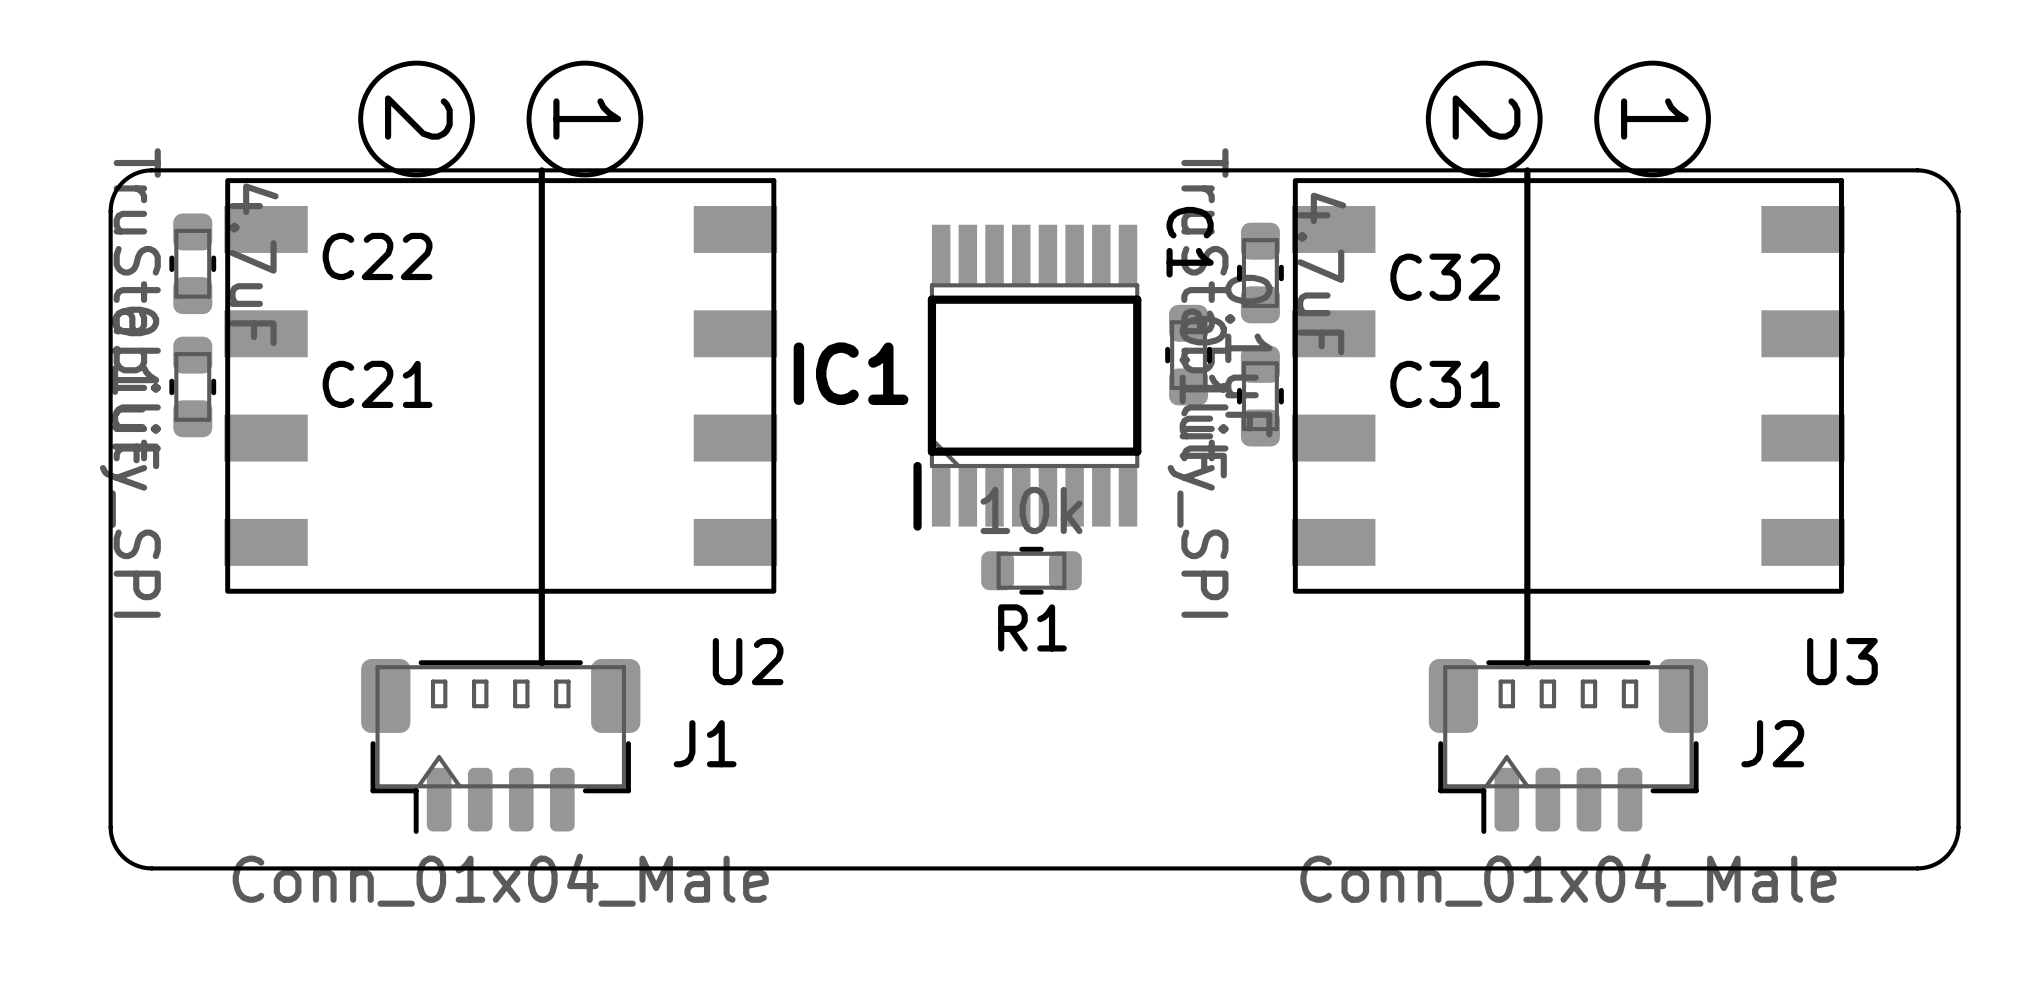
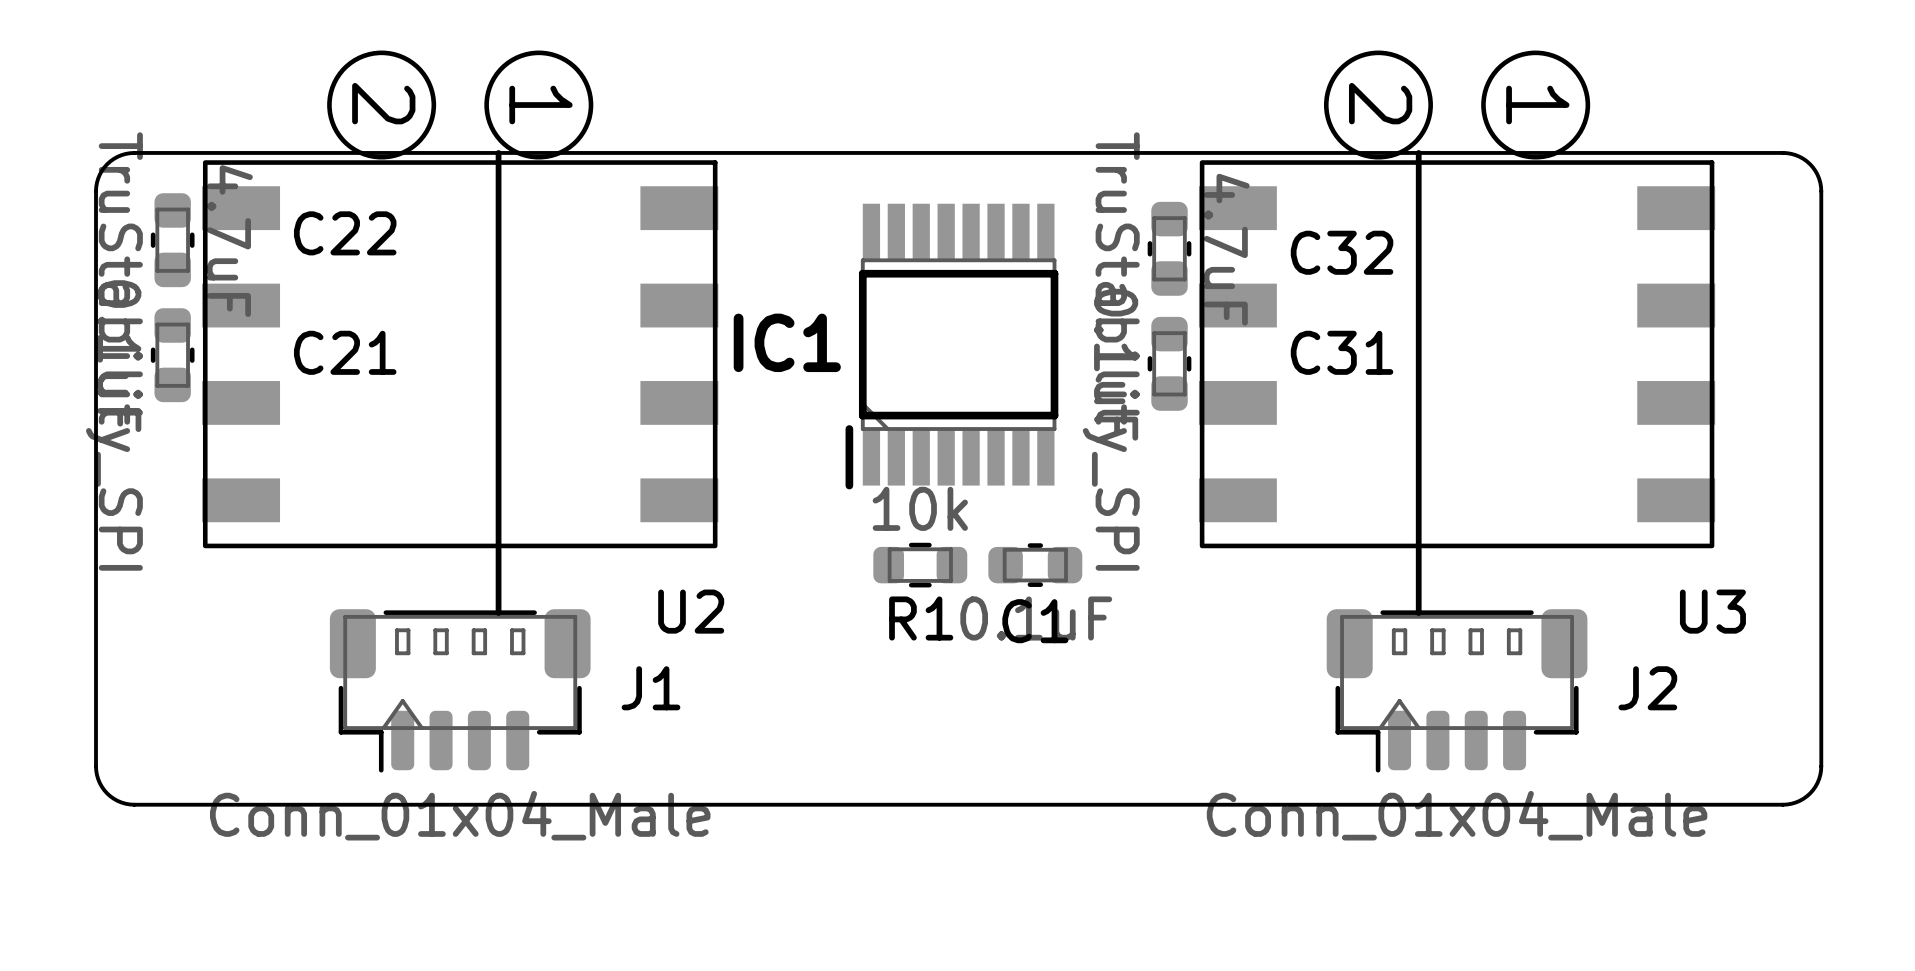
C1 name position: C1 (1190, 242) -> C1 (1035, 621)
C1 rotation: 0° (1188, 355) -> 90° clockwise (1035, 565)
C1 position: (1188, 355) -> (1035, 565)
R1 position: (1031, 570) -> (920, 565)

